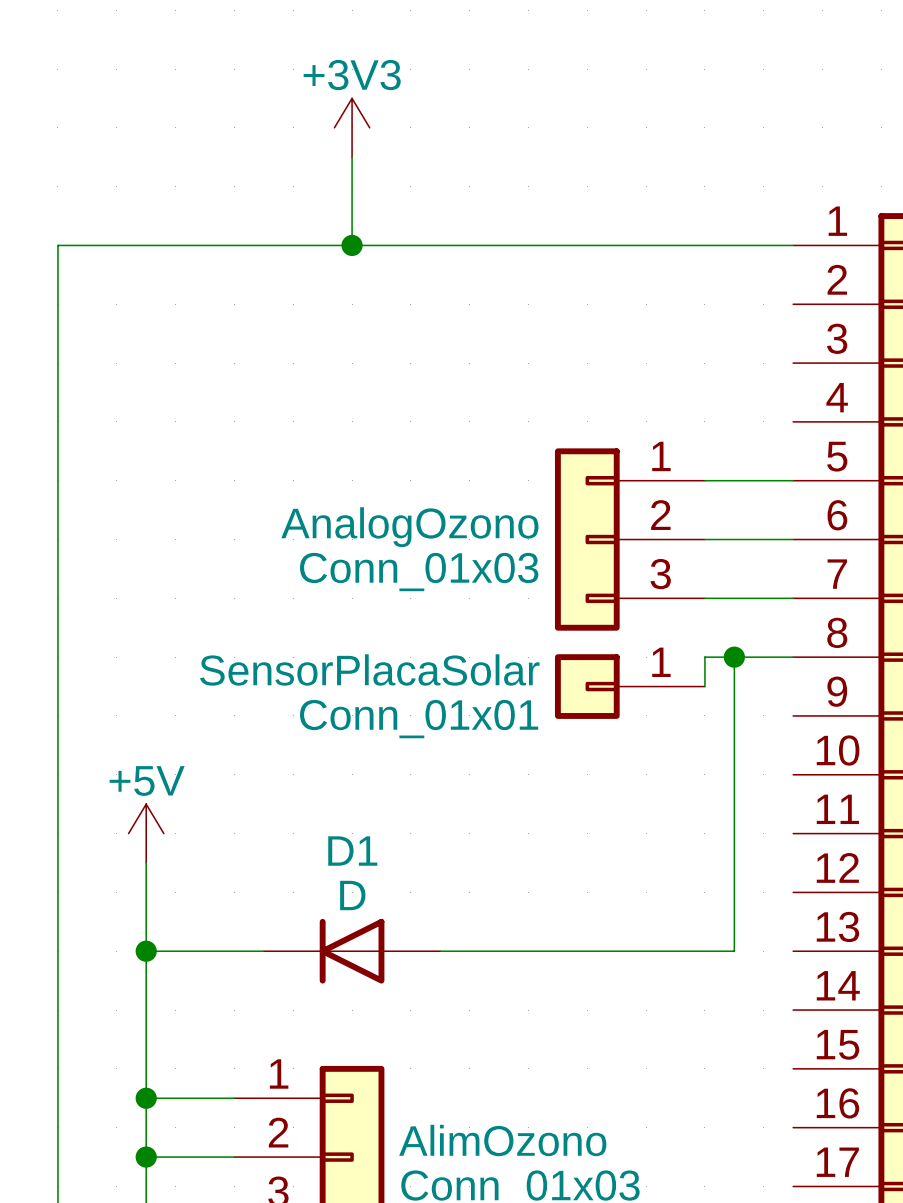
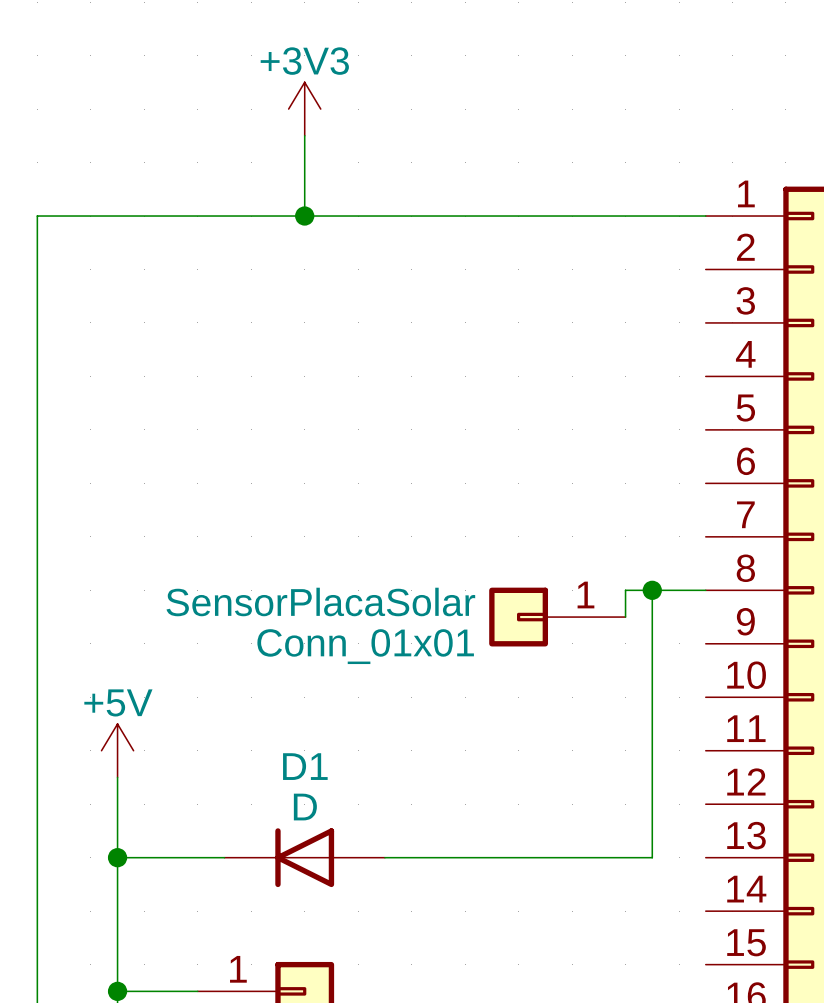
wire: (704, 480) (793, 480) -> none
AnalogOzono: Conn_01x03 (629, 539) -> none
wire: (704, 539) (793, 539) -> none
wire: (704, 598) (793, 598) -> none

